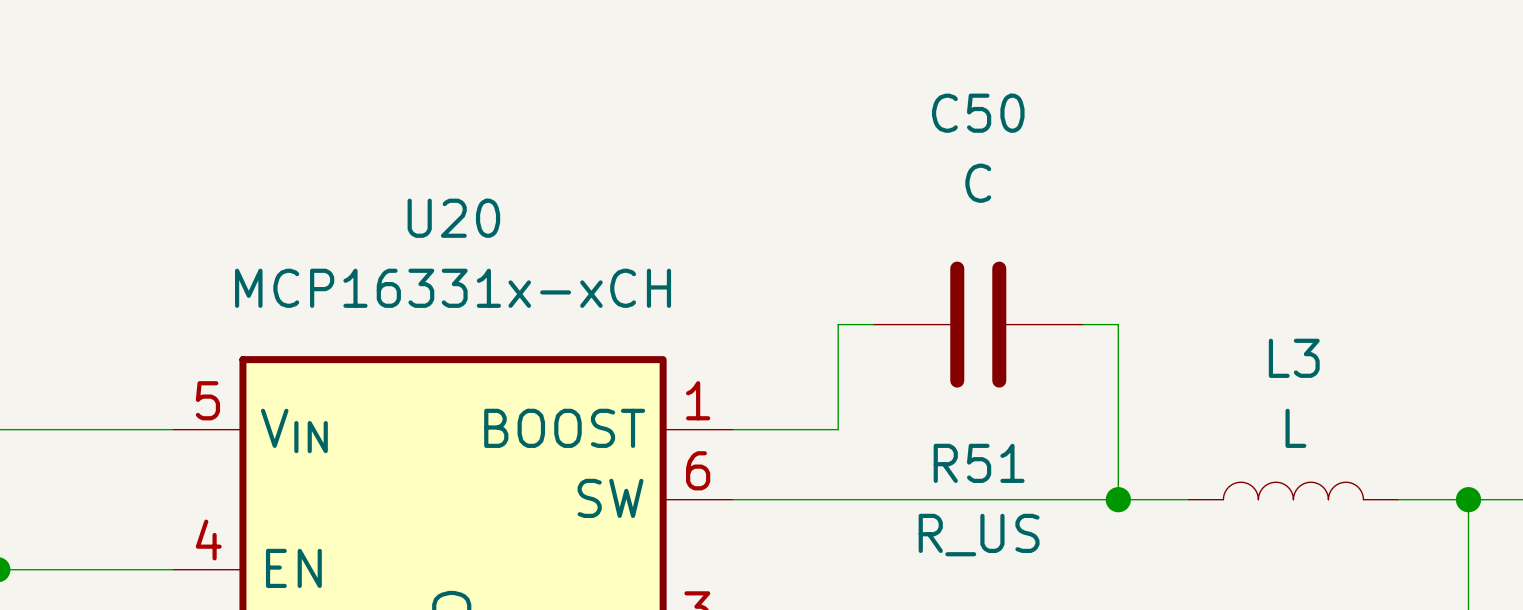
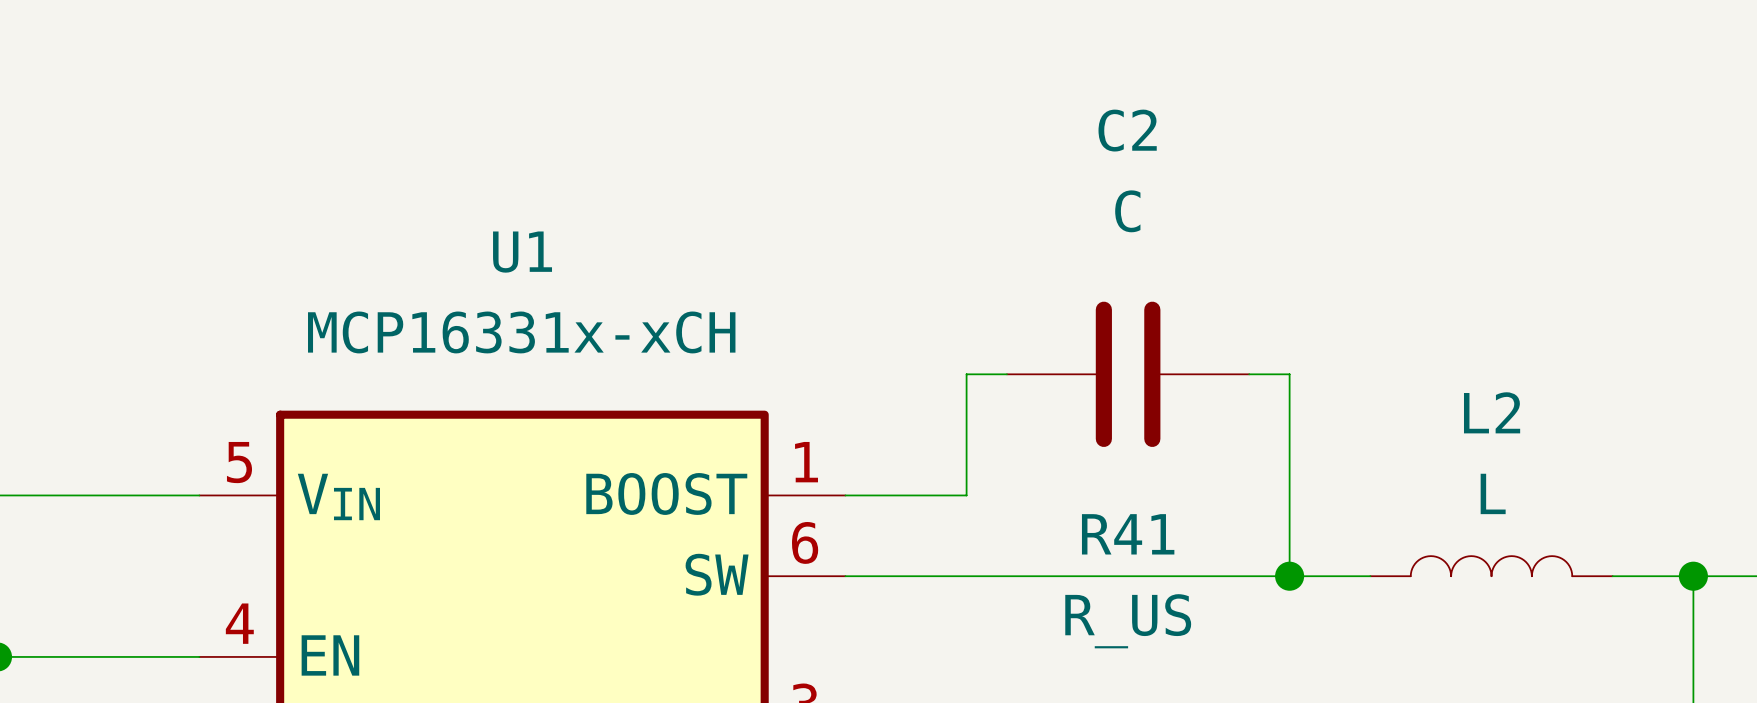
C50 name: C50 (978, 113) -> C2 (1127, 130)
U20 name: U20 (453, 218) -> U1 (522, 252)
L3 name: L3 (1294, 358) -> L2 (1492, 412)
R51 name: R51 (979, 463) -> R41 (1128, 534)

